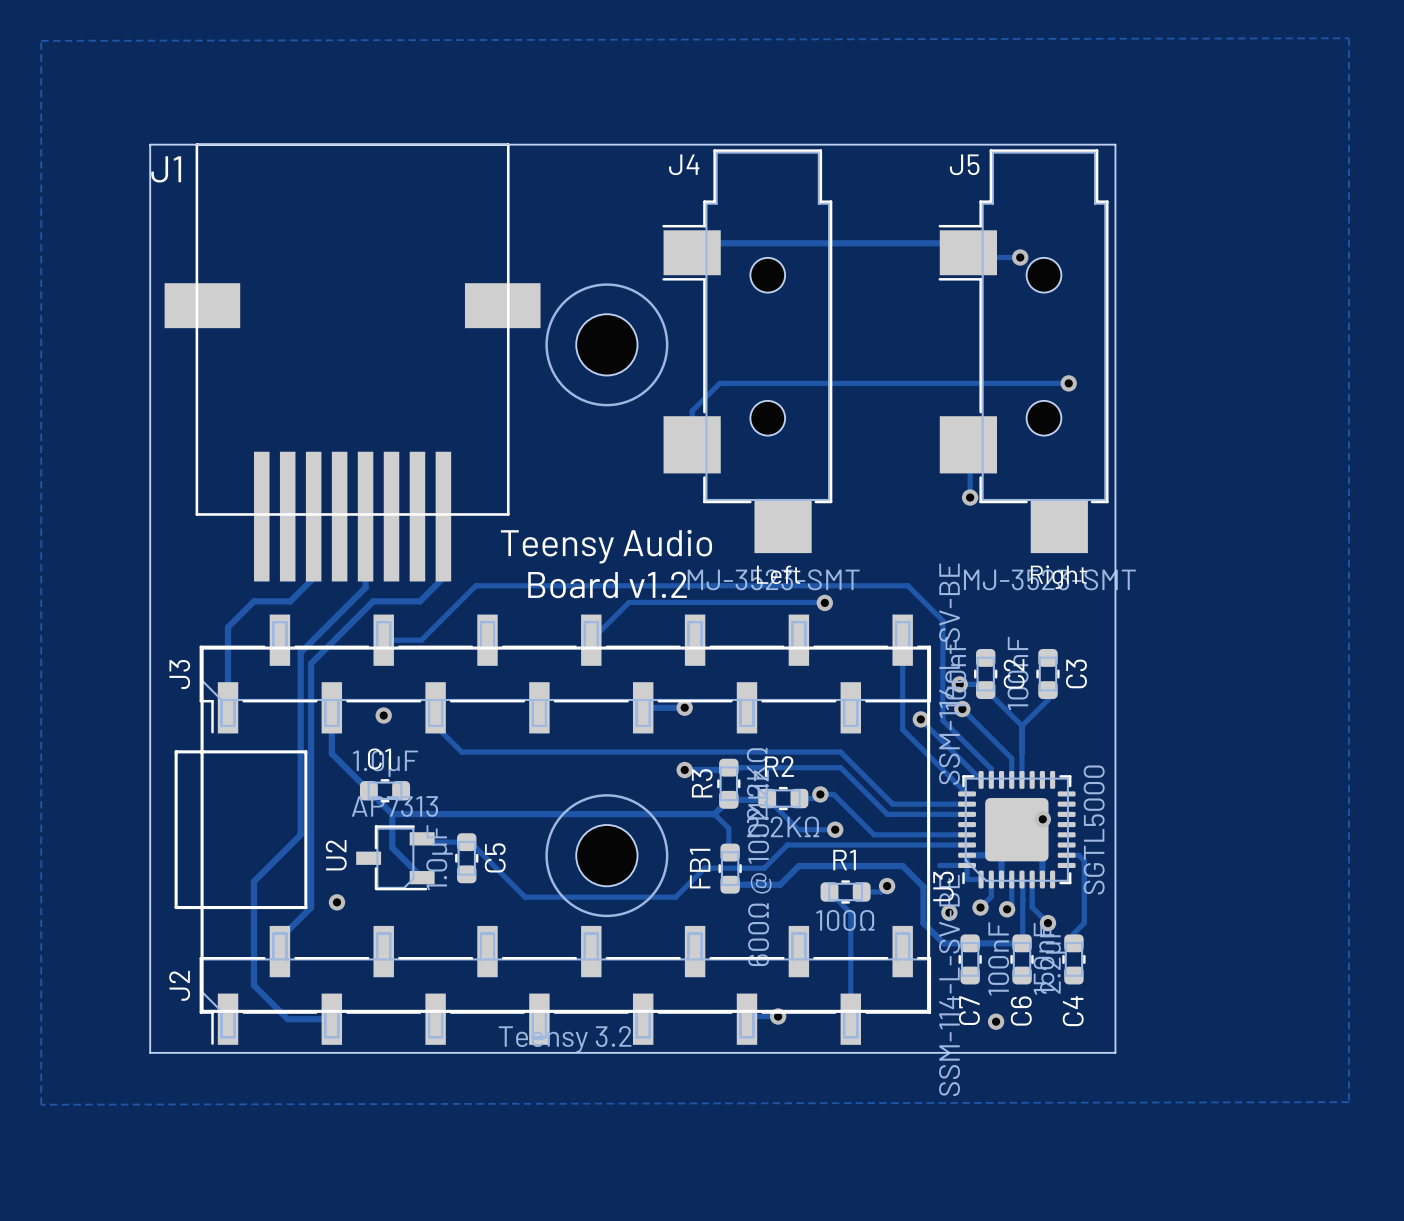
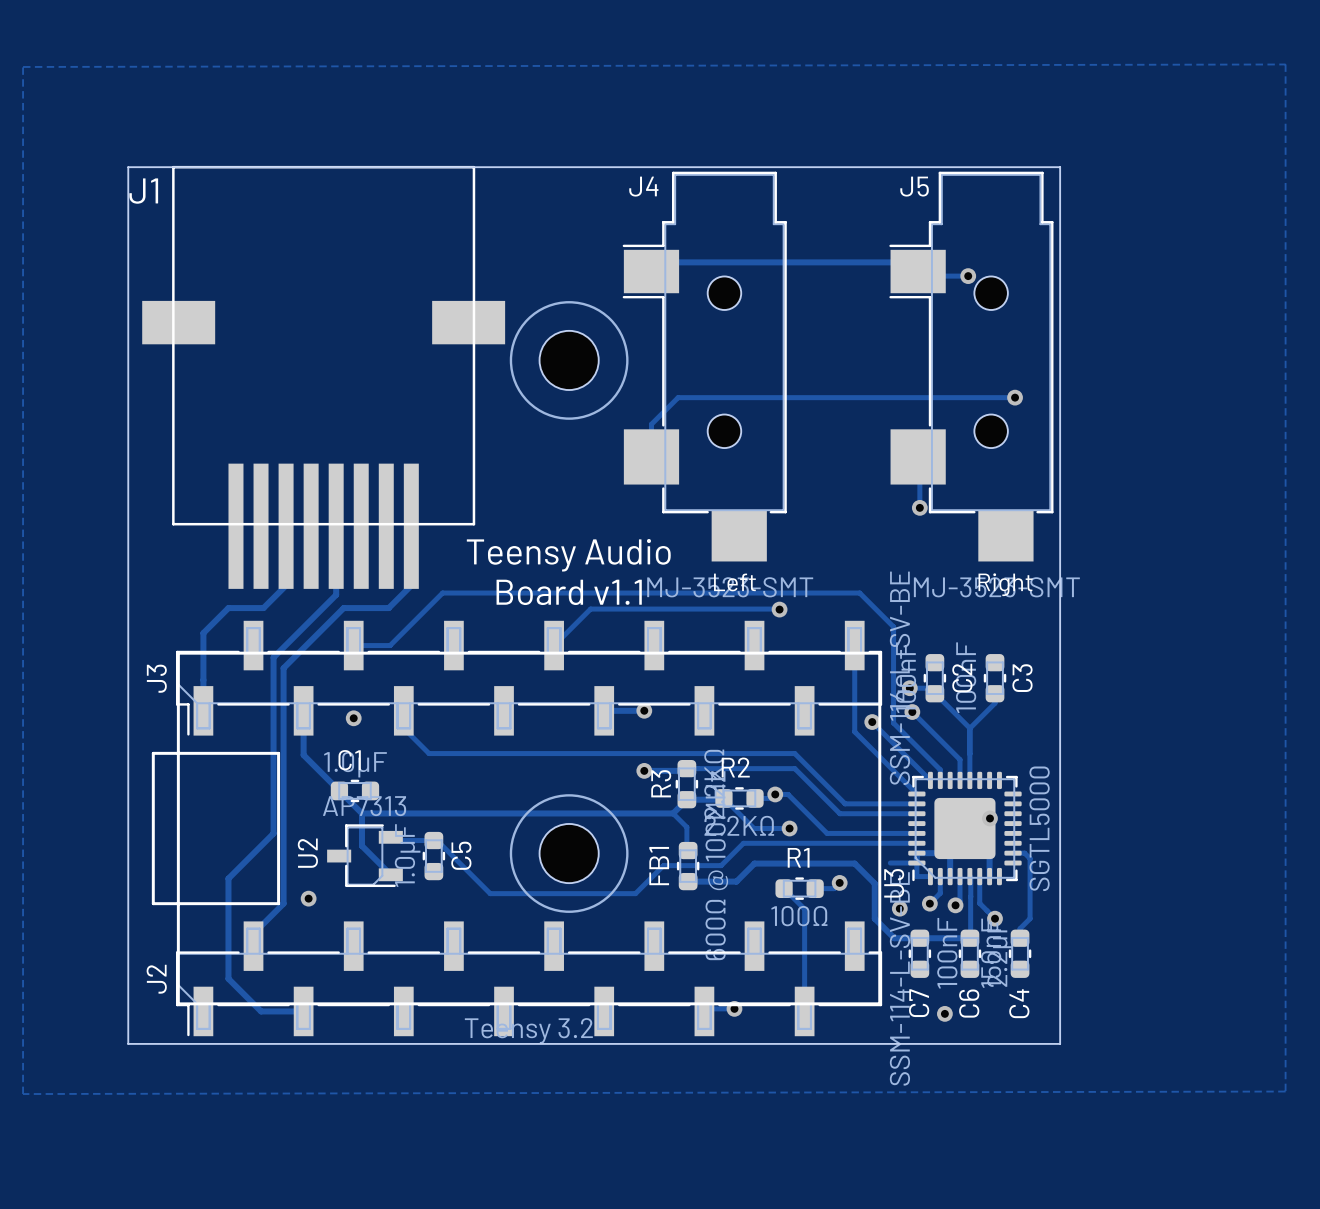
text: Board v1.2 (607, 584) -> Board v1.1 (569, 592)

